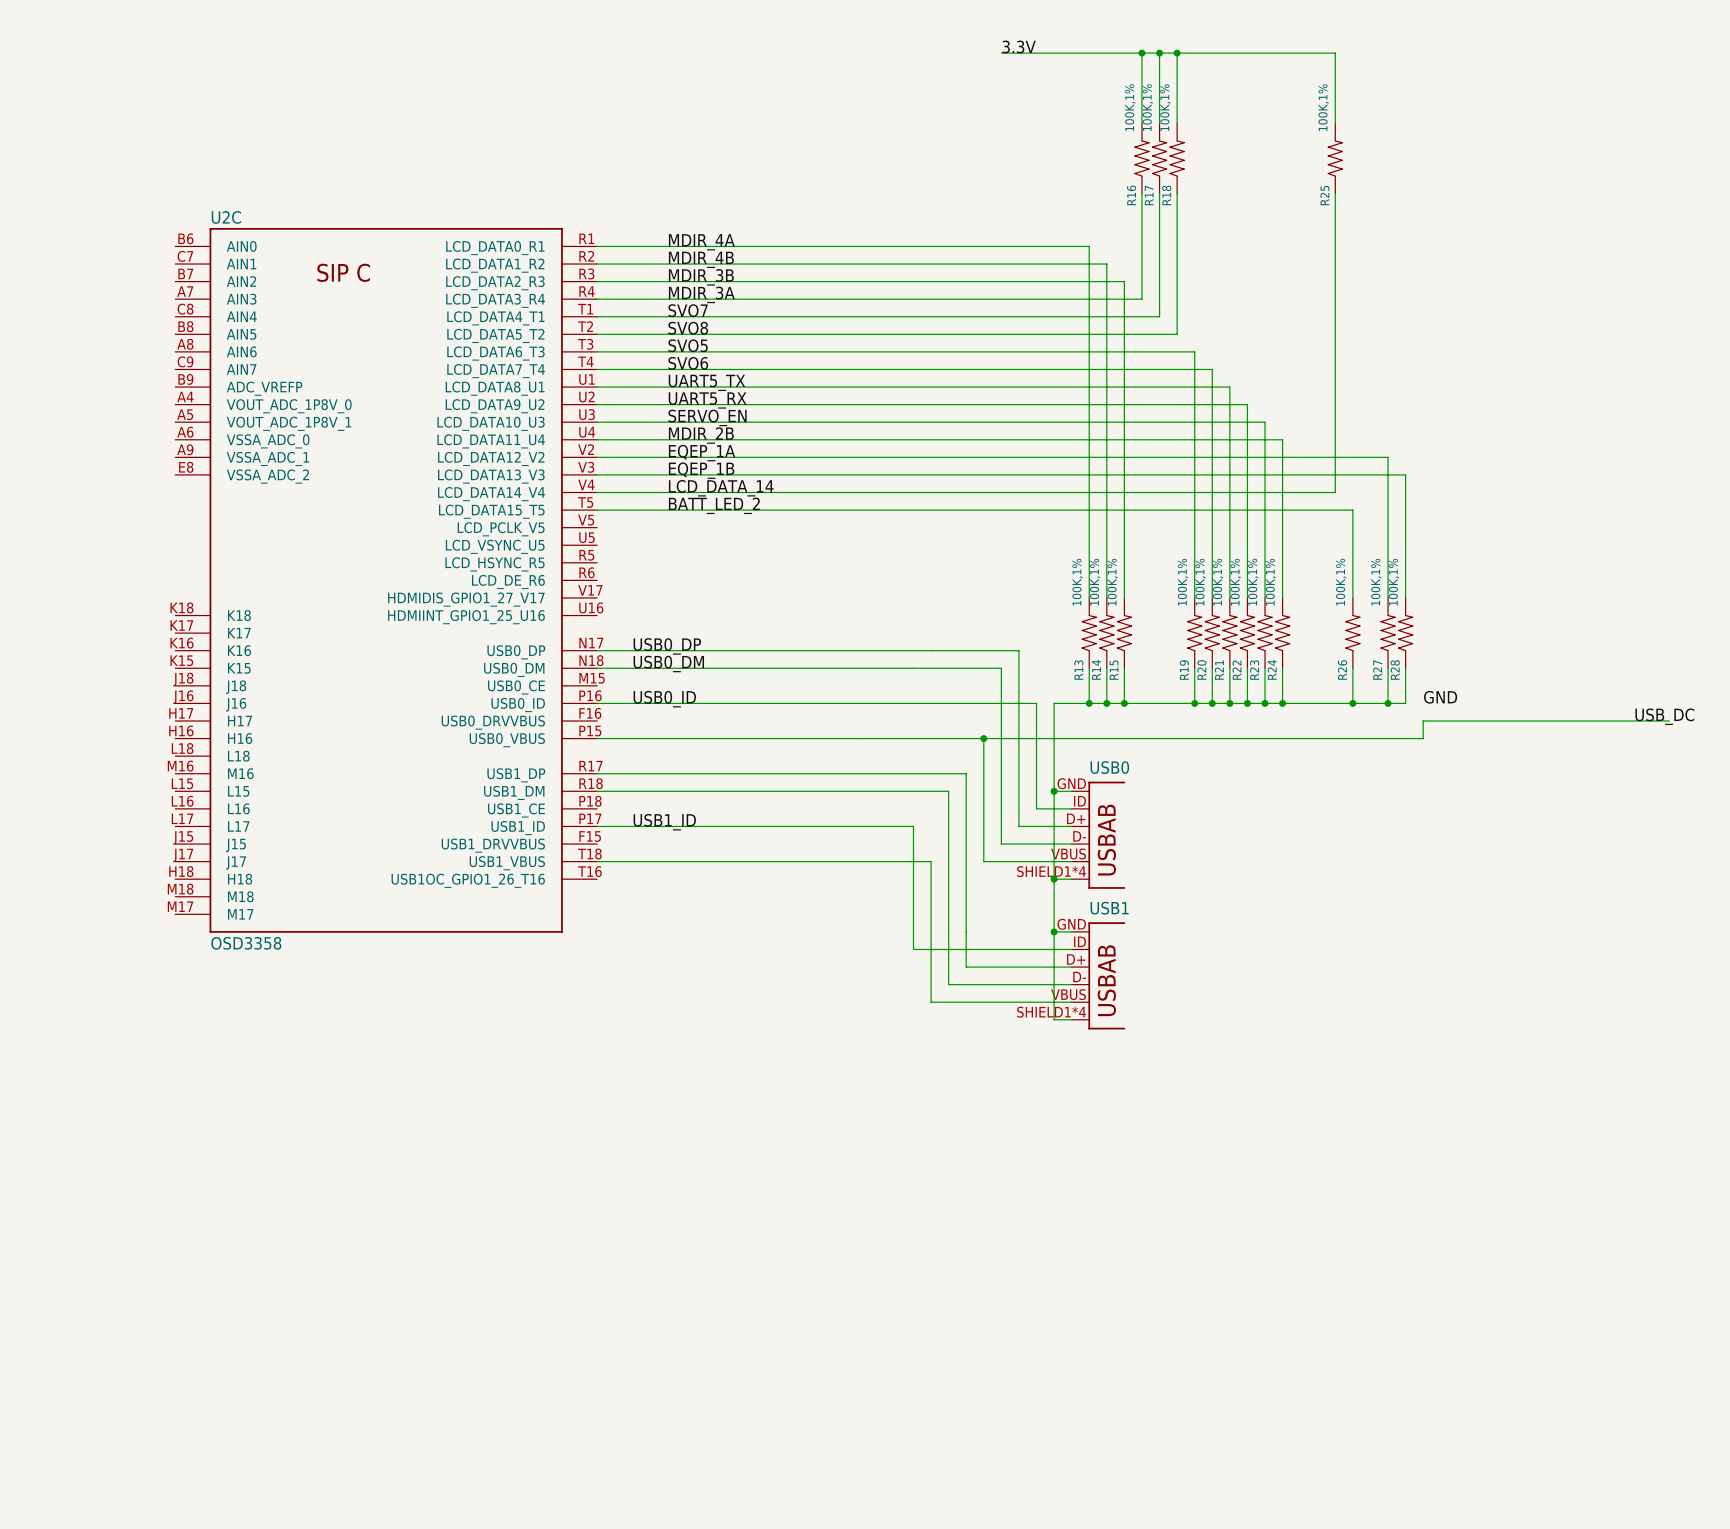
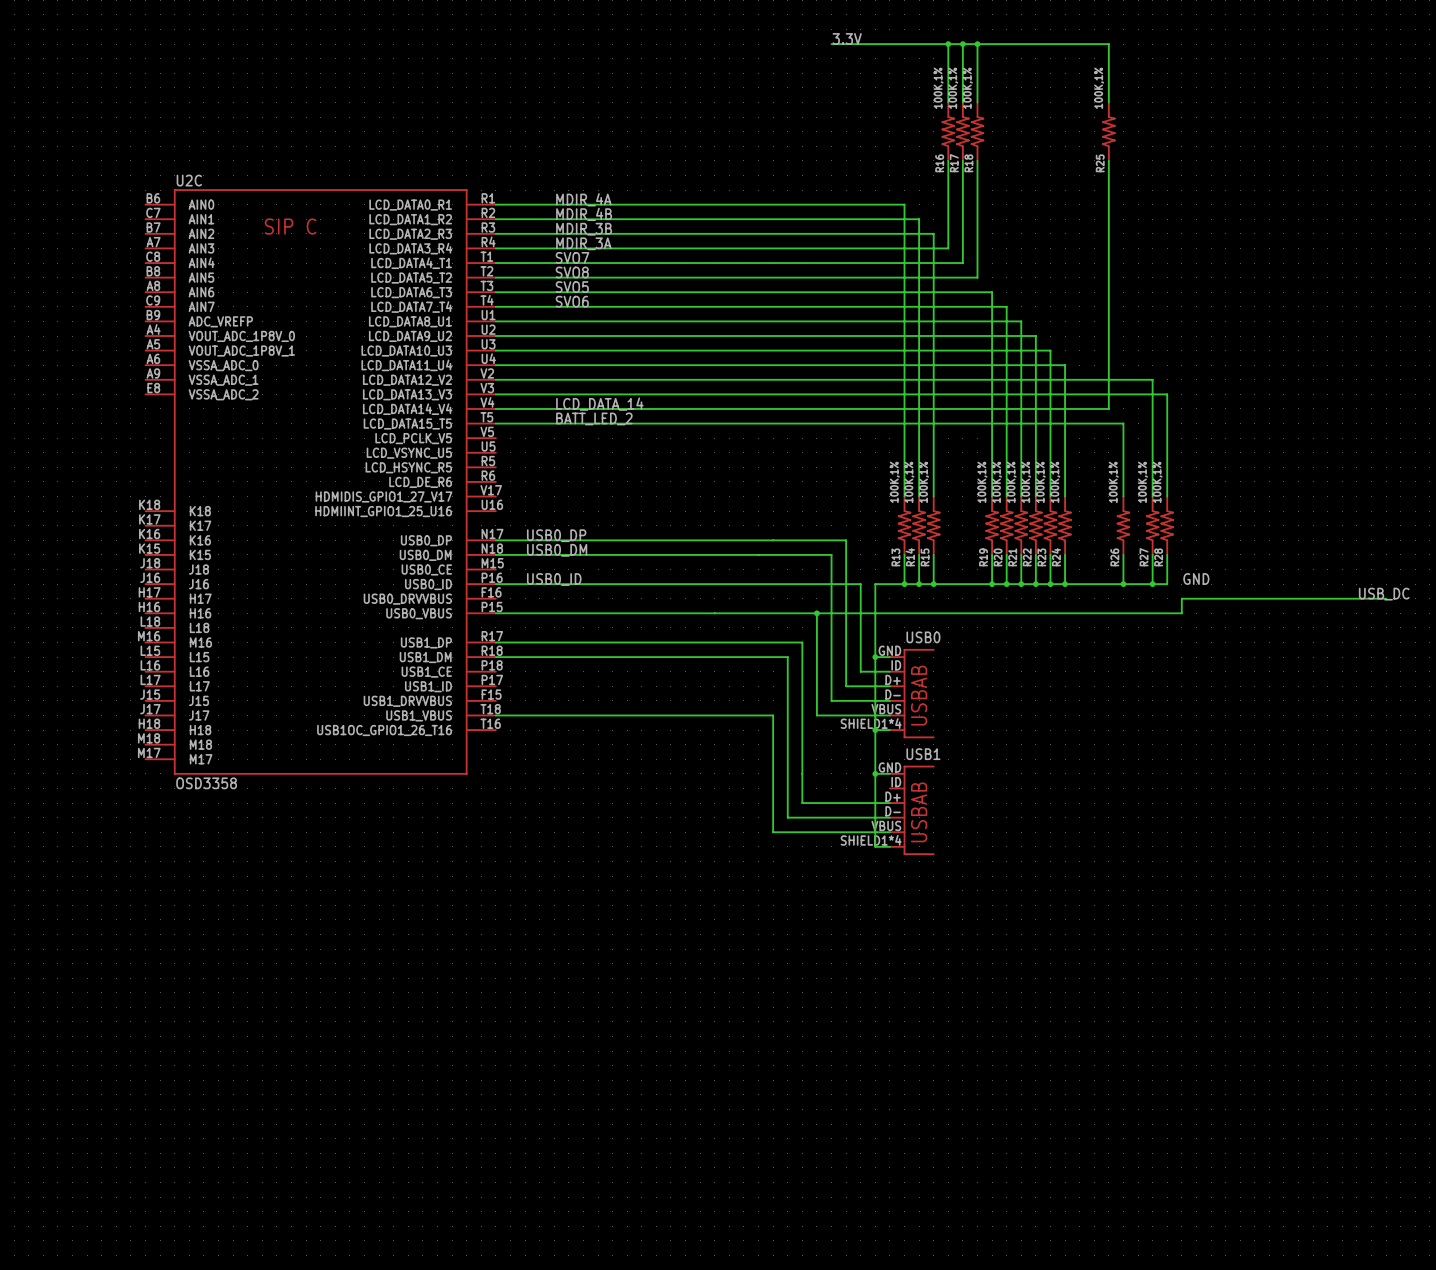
label: UART5_TX (706, 382) -> none
label: UART5_RX (707, 400) -> none
label: SERVO_EN (707, 417) -> none
label: MDIR_2B (701, 435) -> none
label: EQEP_1A (702, 453) -> none
label: EQEP_1B (701, 470) -> none
label: USB1_ID (664, 822) -> none
wire: (597, 826) (913, 826) (913, 949) (1071, 949) -> none

